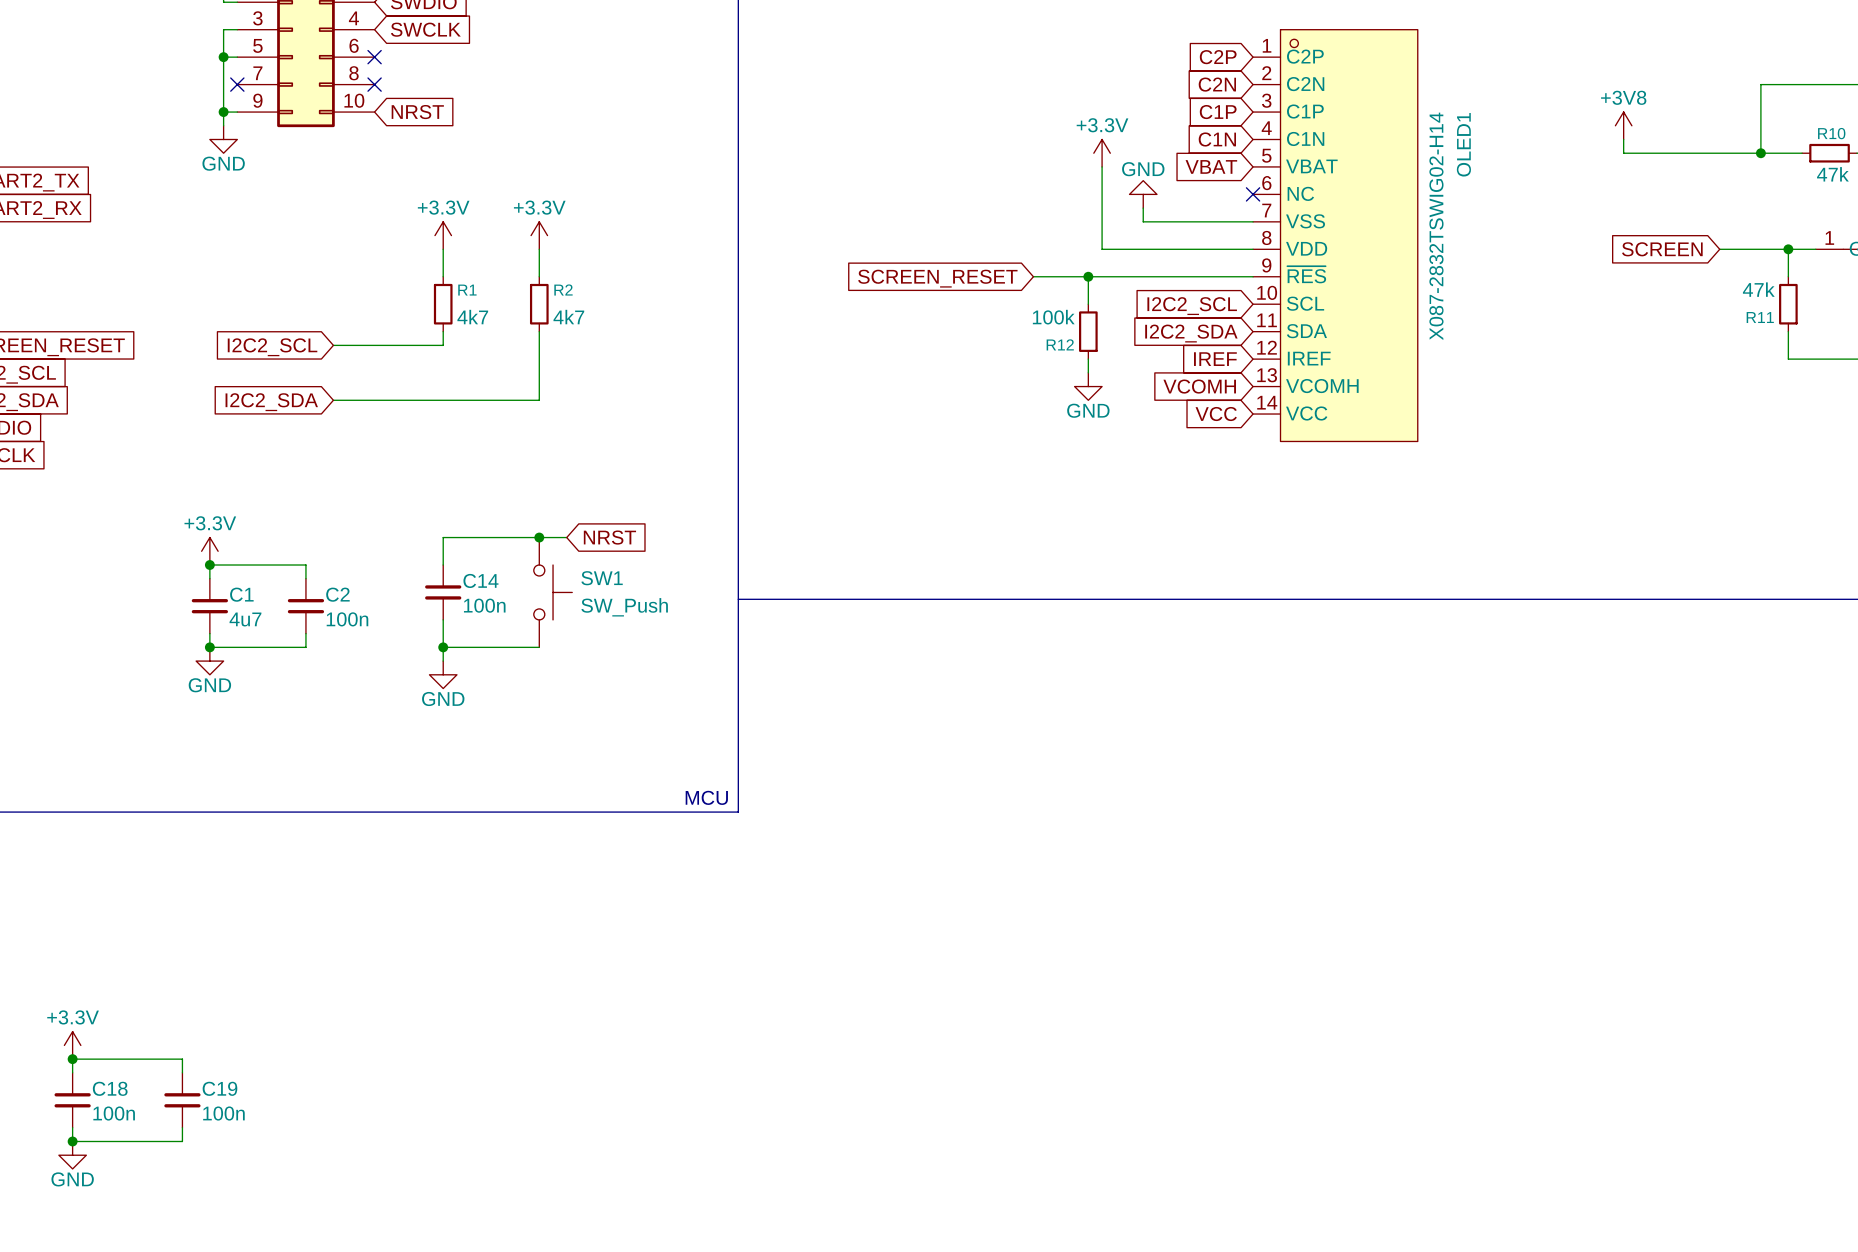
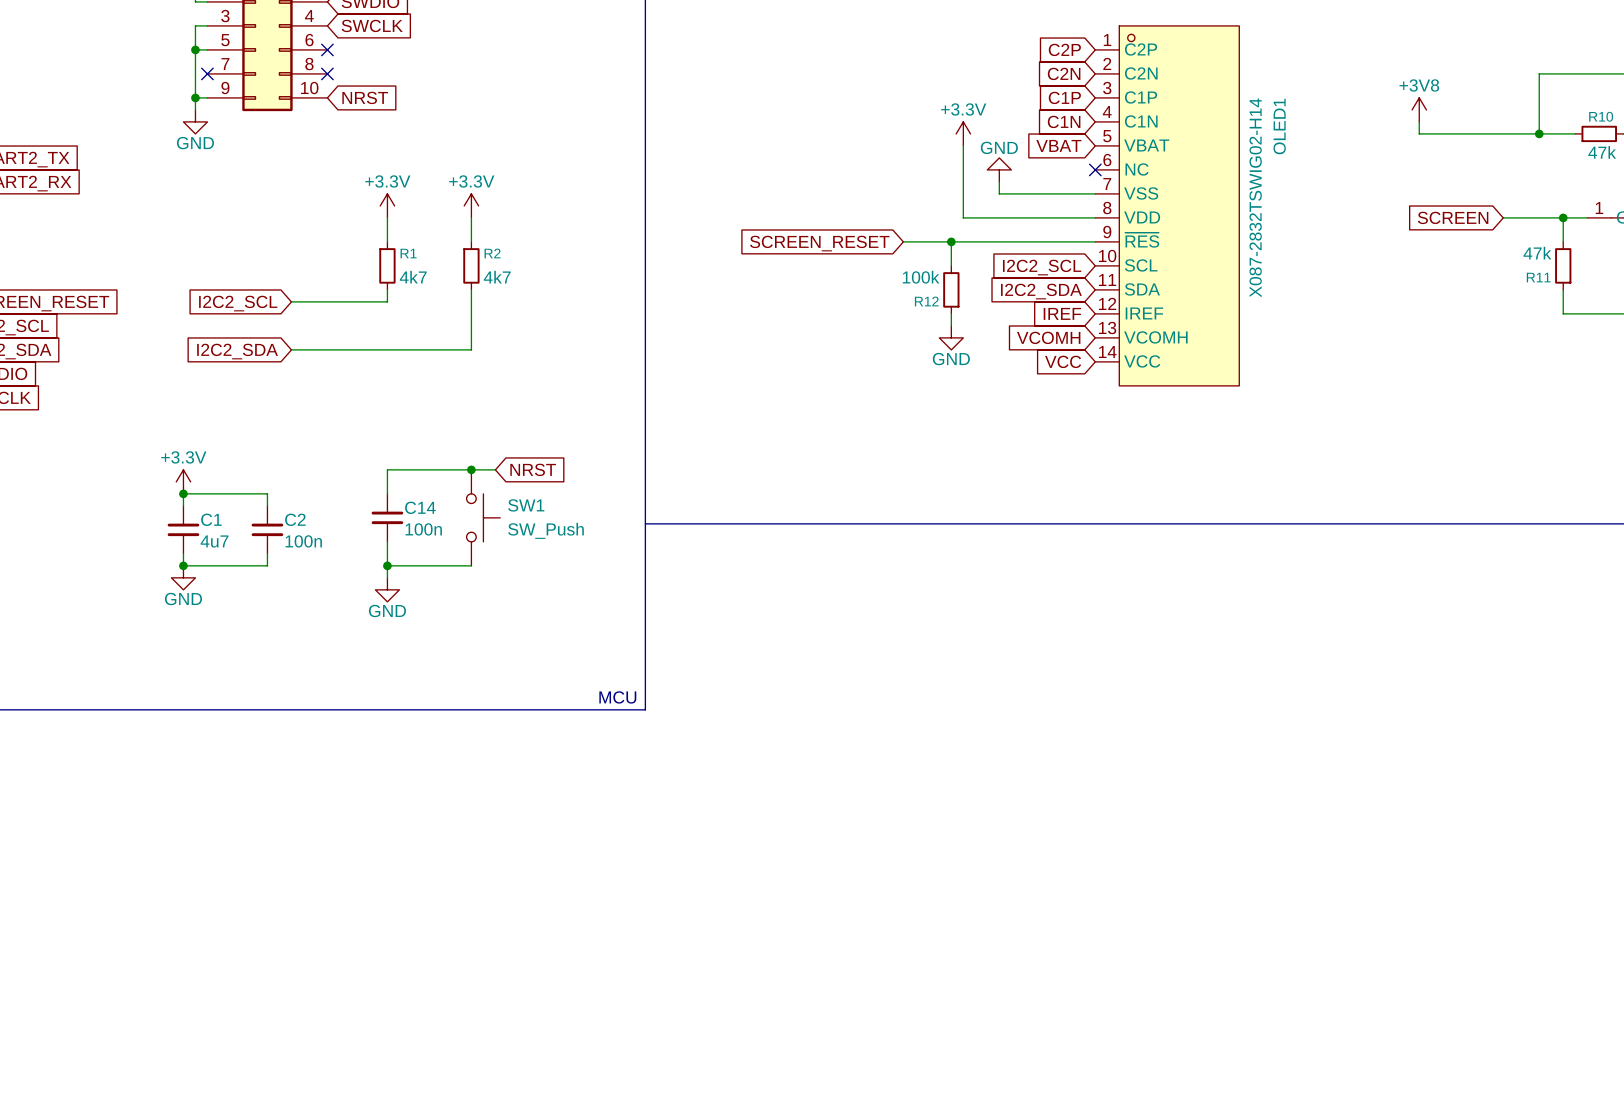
power symbol: +3.3V (72, 1045) -> none
junction: (72, 1059) -> none
wire: (72, 1072) (72, 1059) (182, 1059) (182, 1072) -> none
C18: 100n (72, 1100) -> none
C19: 100n (182, 1100) -> none
wire: (72, 1127) (72, 1141) (182, 1141) (182, 1127) -> none
junction: (72, 1141) -> none
power symbol: GND (72, 1155) -> none

